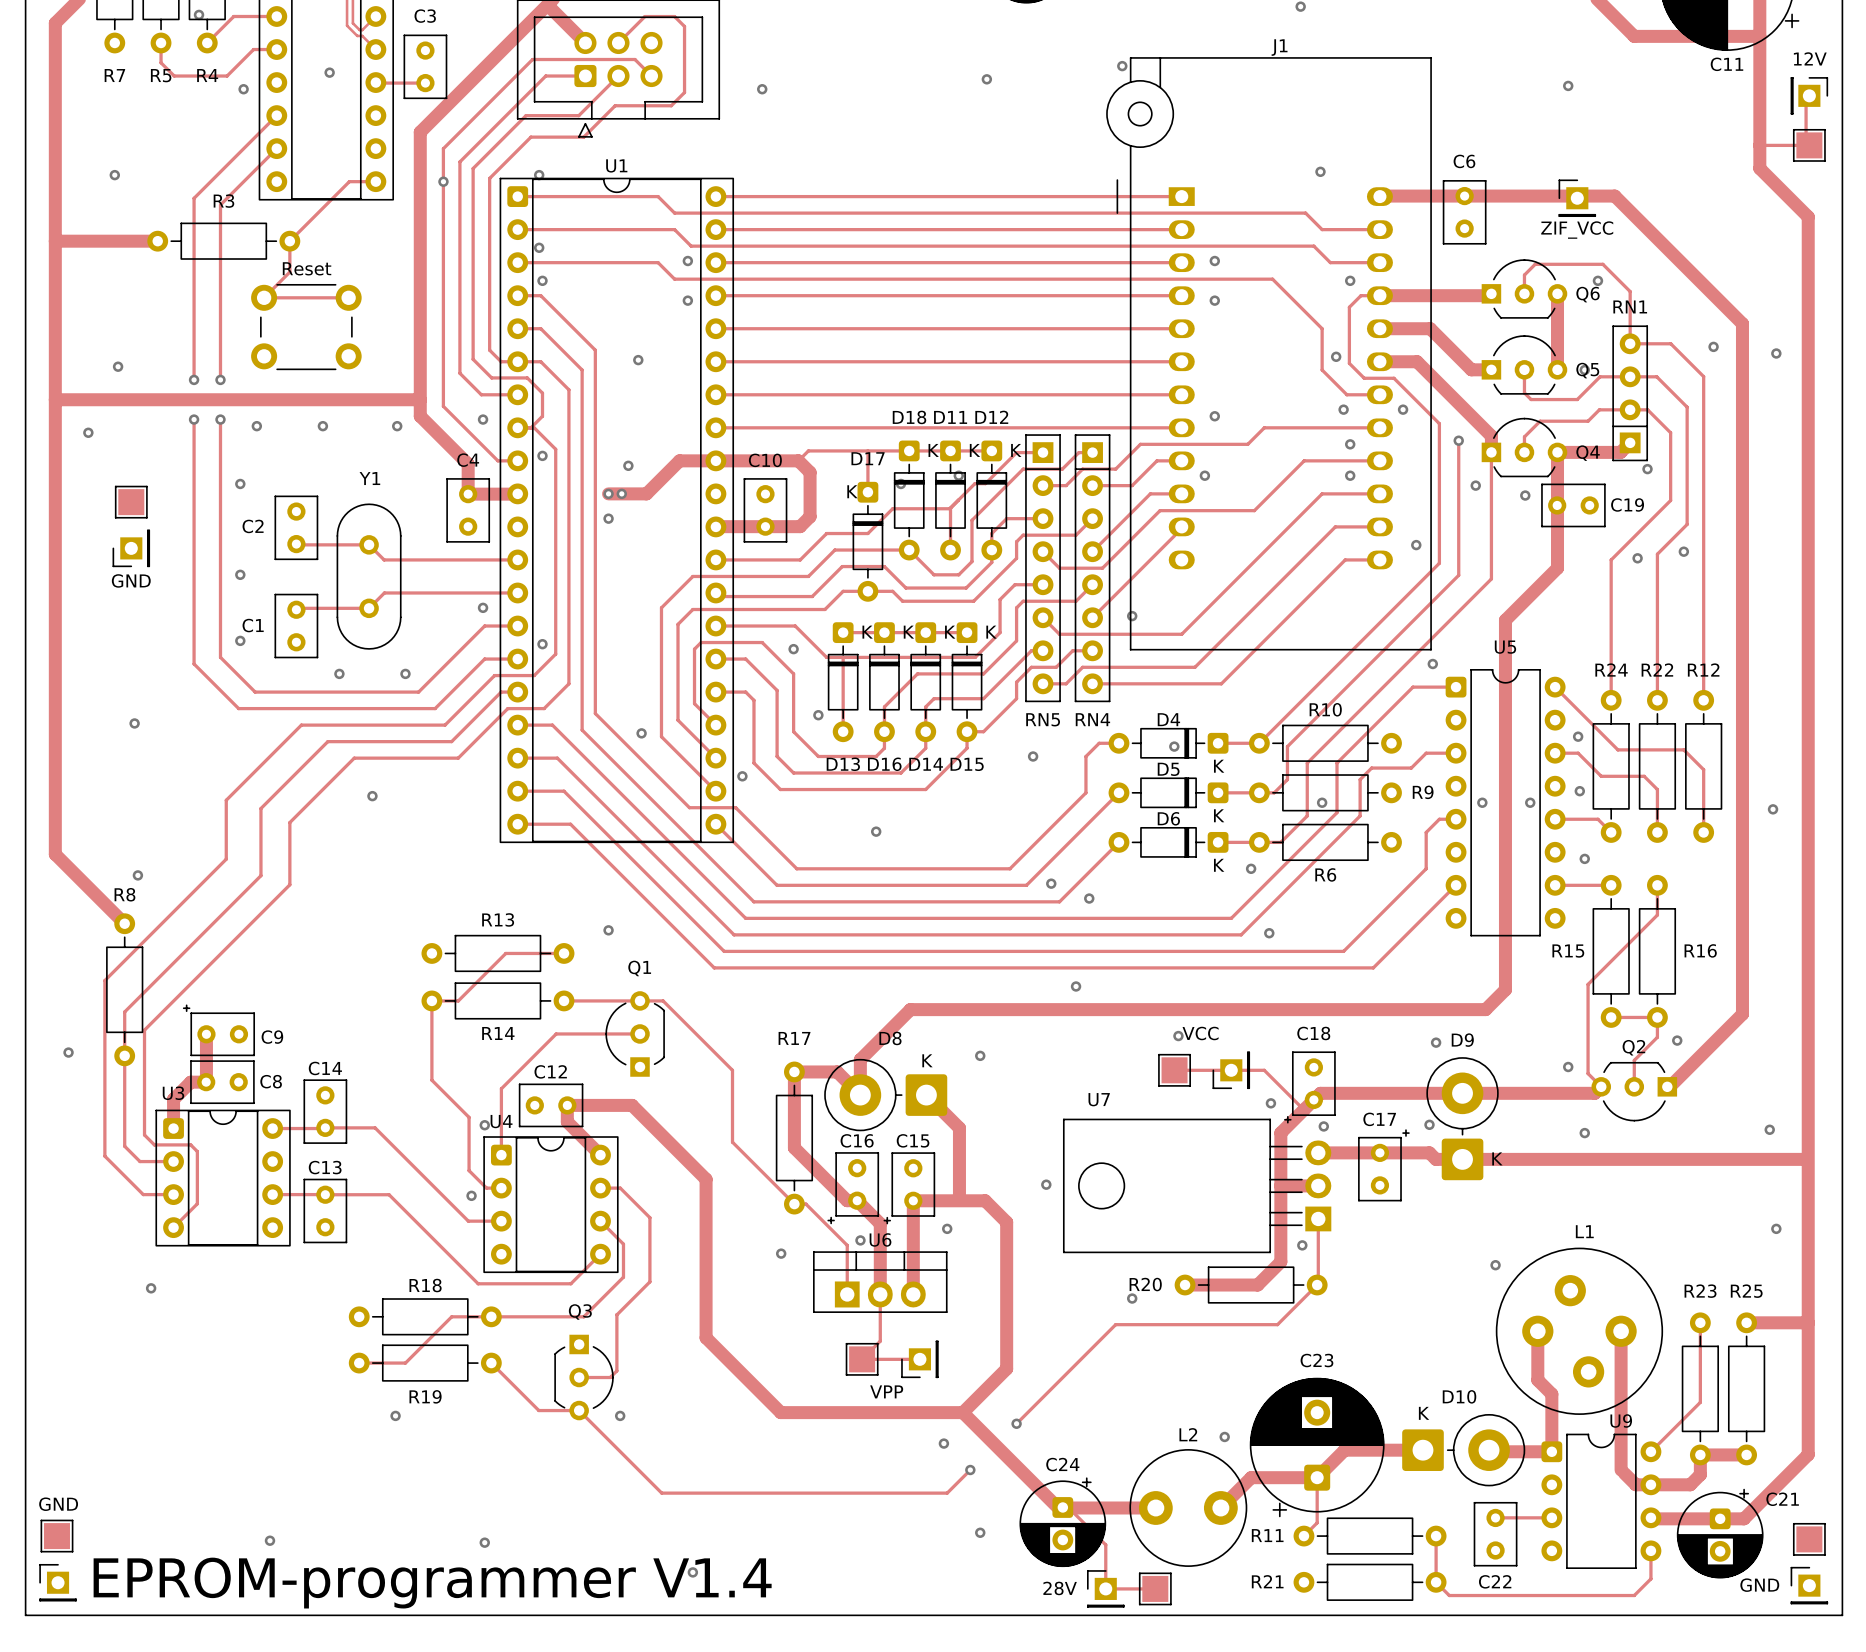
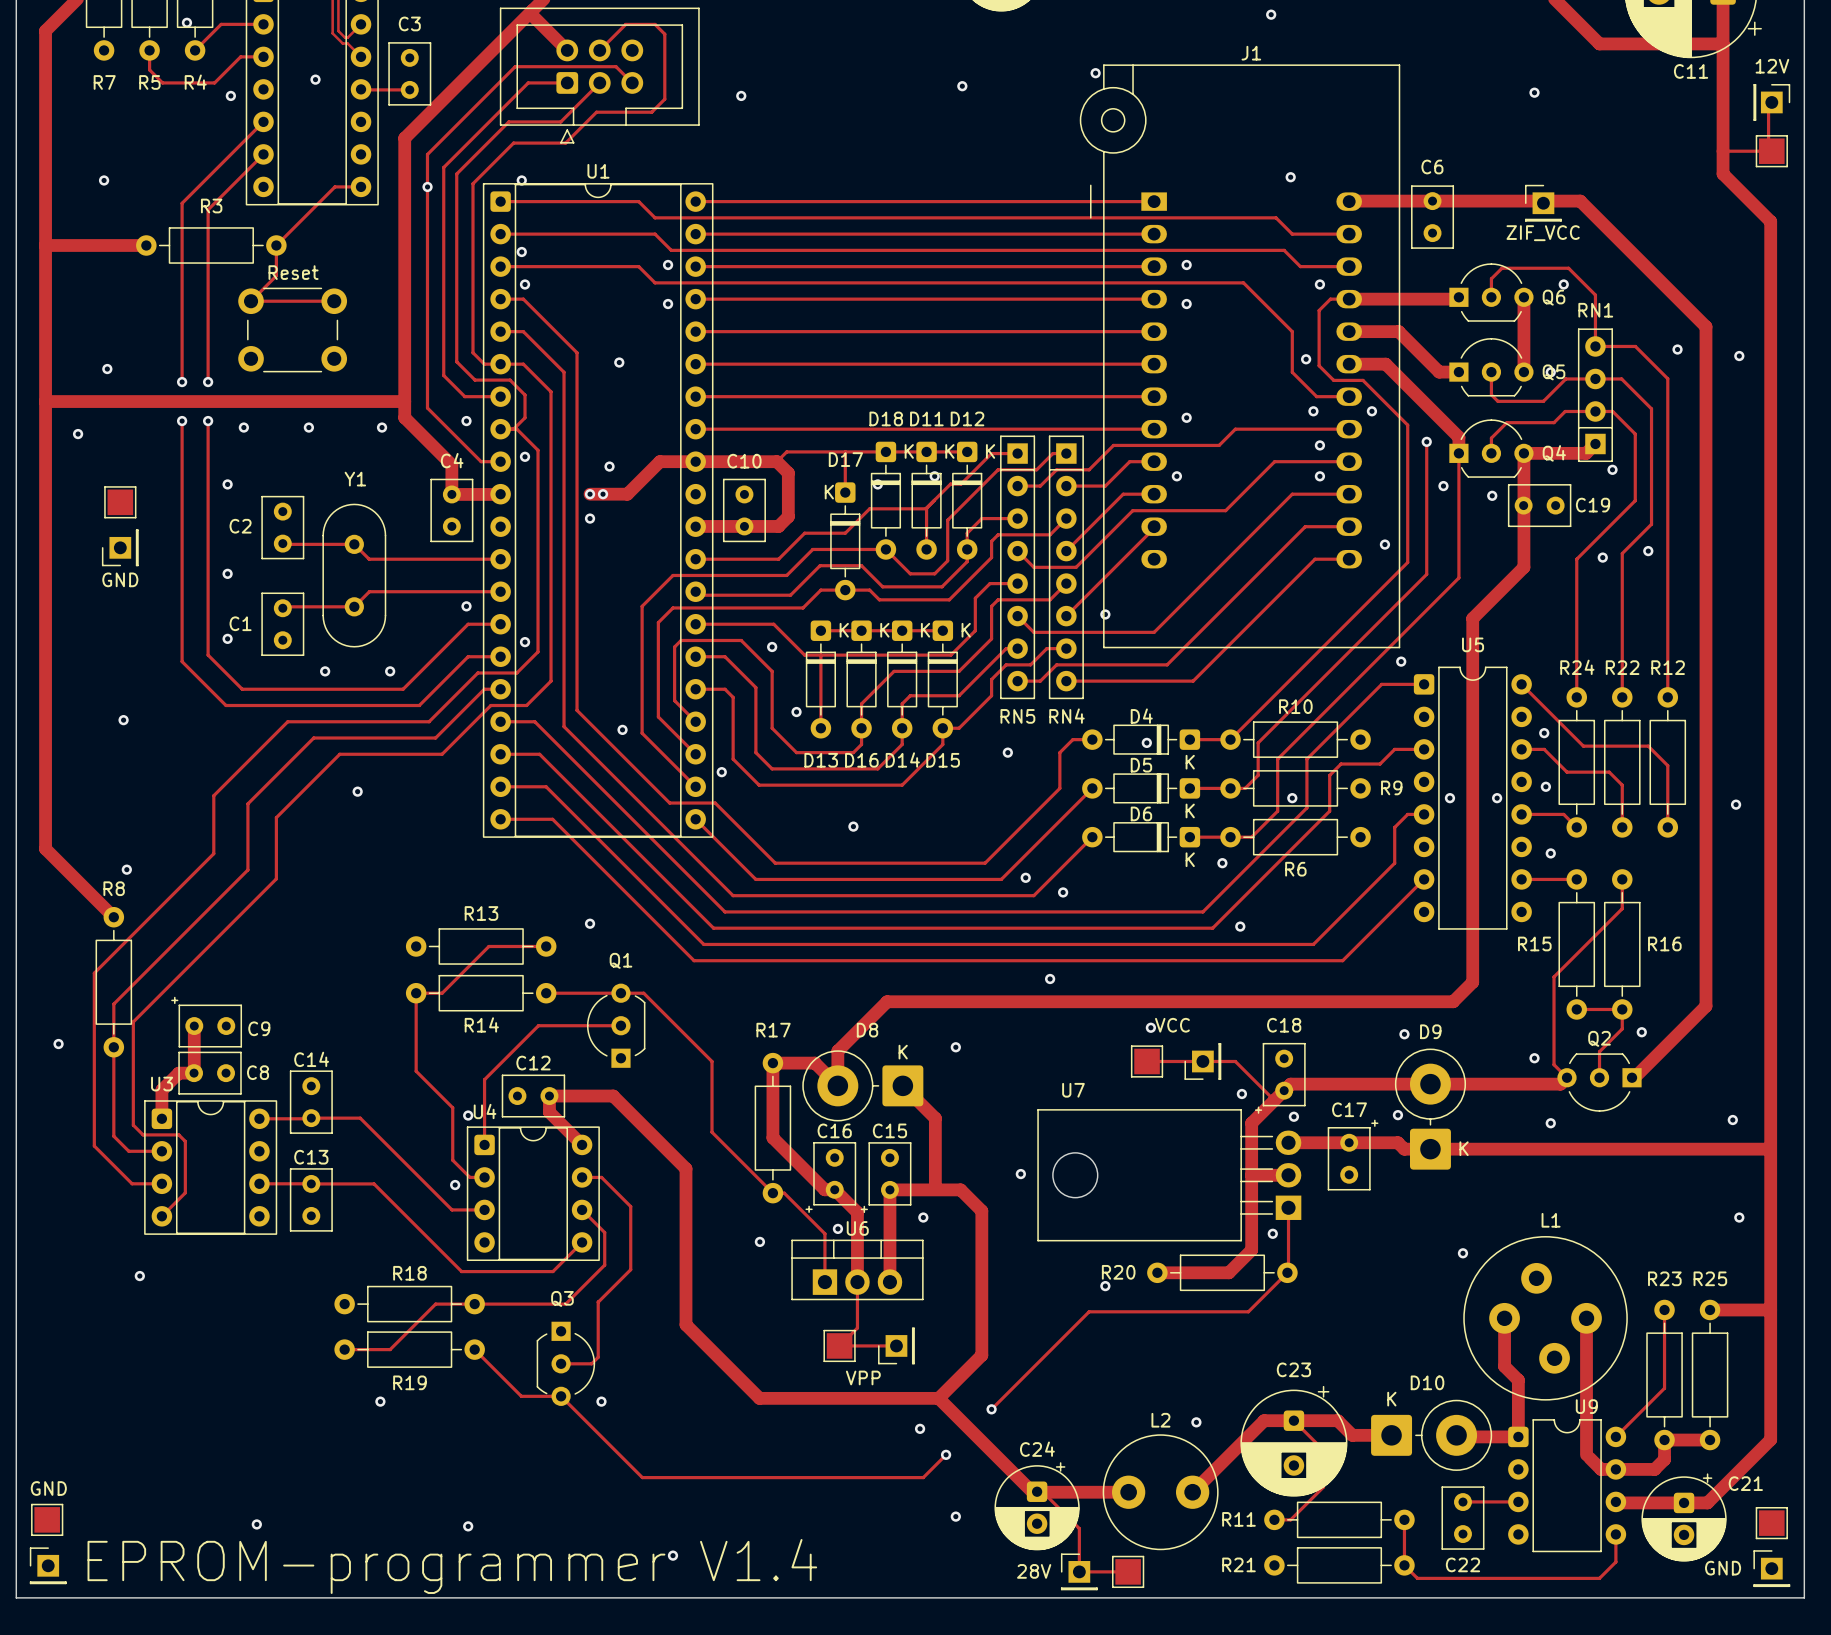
C23 footprint: [1249, 1377, 1385, 1518] -> [1240, 1385, 1348, 1497]
track: (1383, 1450) (1344, 1450) (1317, 1477) -> (1352, 1435) (1337, 1420) (1264, 1420) (1222, 1462)
track: (1251, 1477) (1317, 1477) -> none
track: (1317, 1477) (1317, 1522) (1303, 1536) -> (1293, 1420) (1323, 1449) (1323, 1487) (1290, 1519) (1274, 1519)

